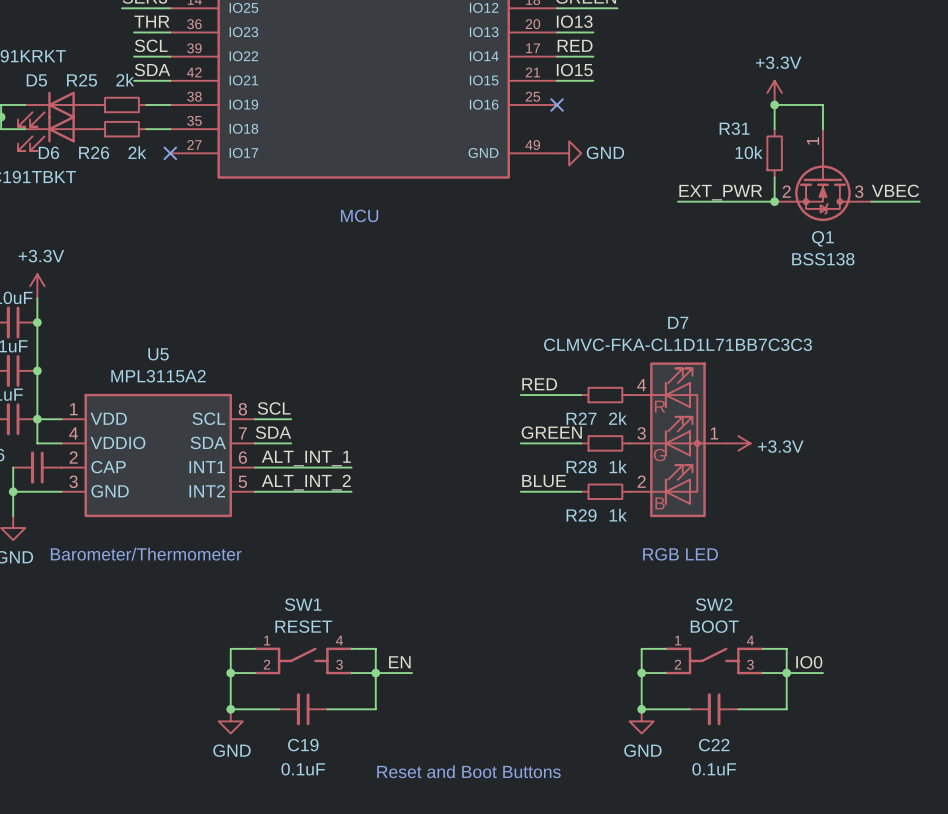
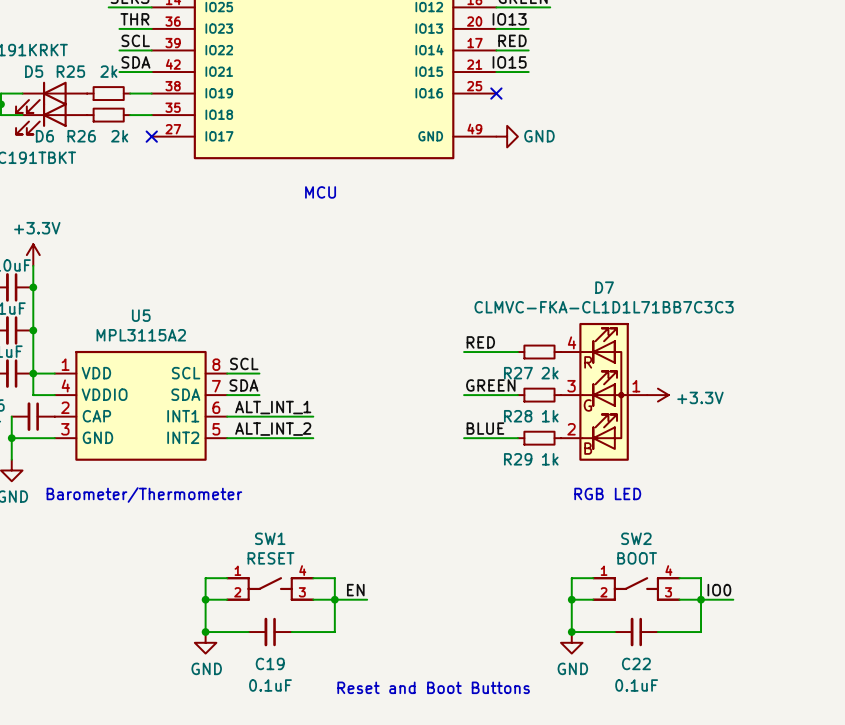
power symbol: +3.3V (774, 92) -> none
junction: (774, 104) -> none
wire: (774, 129) (774, 104) (822, 104) (822, 129) -> none
R31: 10k (774, 153) -> none
Q1: BSS138 (822, 175) -> none
wire: (774, 177) (774, 201) (677, 201) -> none
label: VBEC (895, 190) -> none
label: EXT_PWR (720, 192) -> none
junction: (774, 201) -> none
wire: (871, 201) (919, 201) -> none

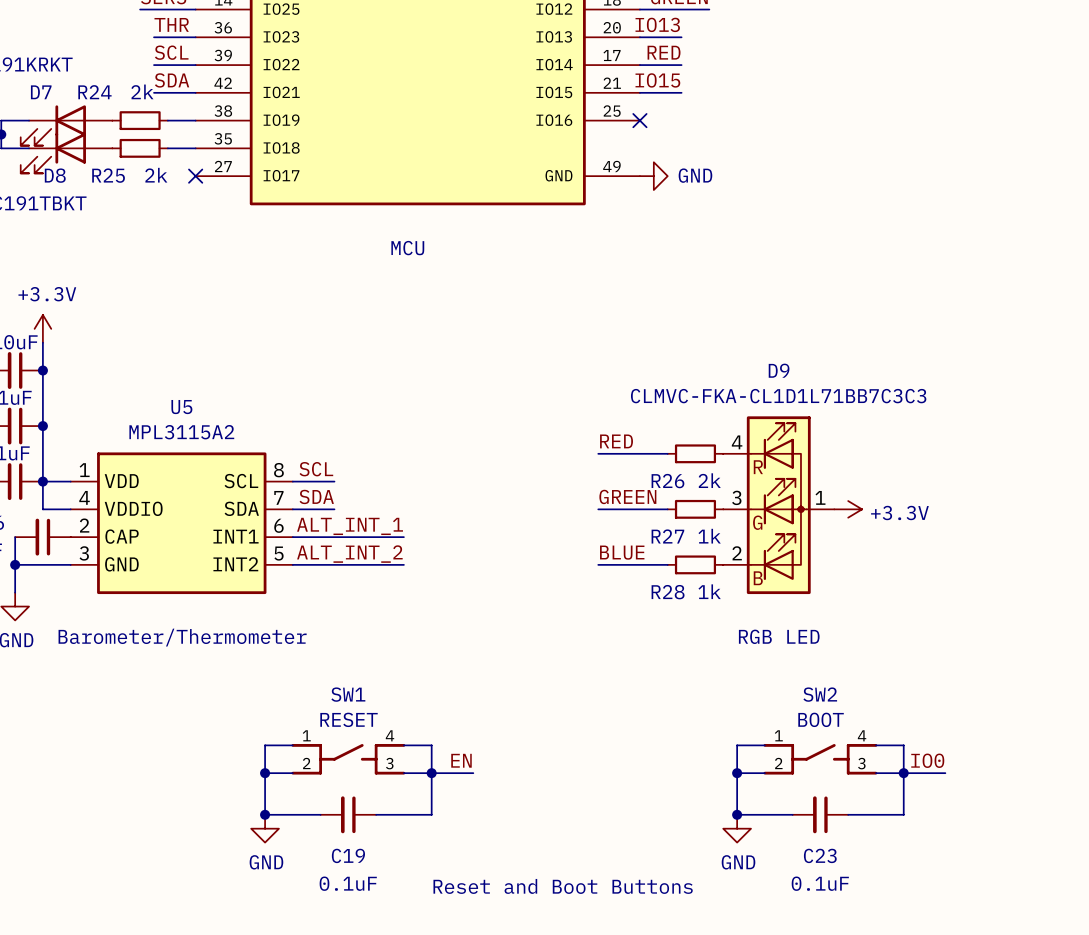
D5 name: D5 (34, 71) -> D7 (41, 92)
R25 name: R25 (70, 71) -> R24 (94, 92)
D6 name: D6 (44, 136) -> D8 (55, 175)
R26 name: R26 (81, 136) -> R25 (108, 175)
D7 name: D7 (604, 287) -> D9 (779, 370)
R27 name: R27 (518, 373) -> R26 (667, 481)
R28 name: R28 (518, 416) -> R27 (667, 536)
R29 name: R29 (518, 459) -> R28 (668, 592)
C22 name: C22 (636, 663) -> C23 (820, 855)

